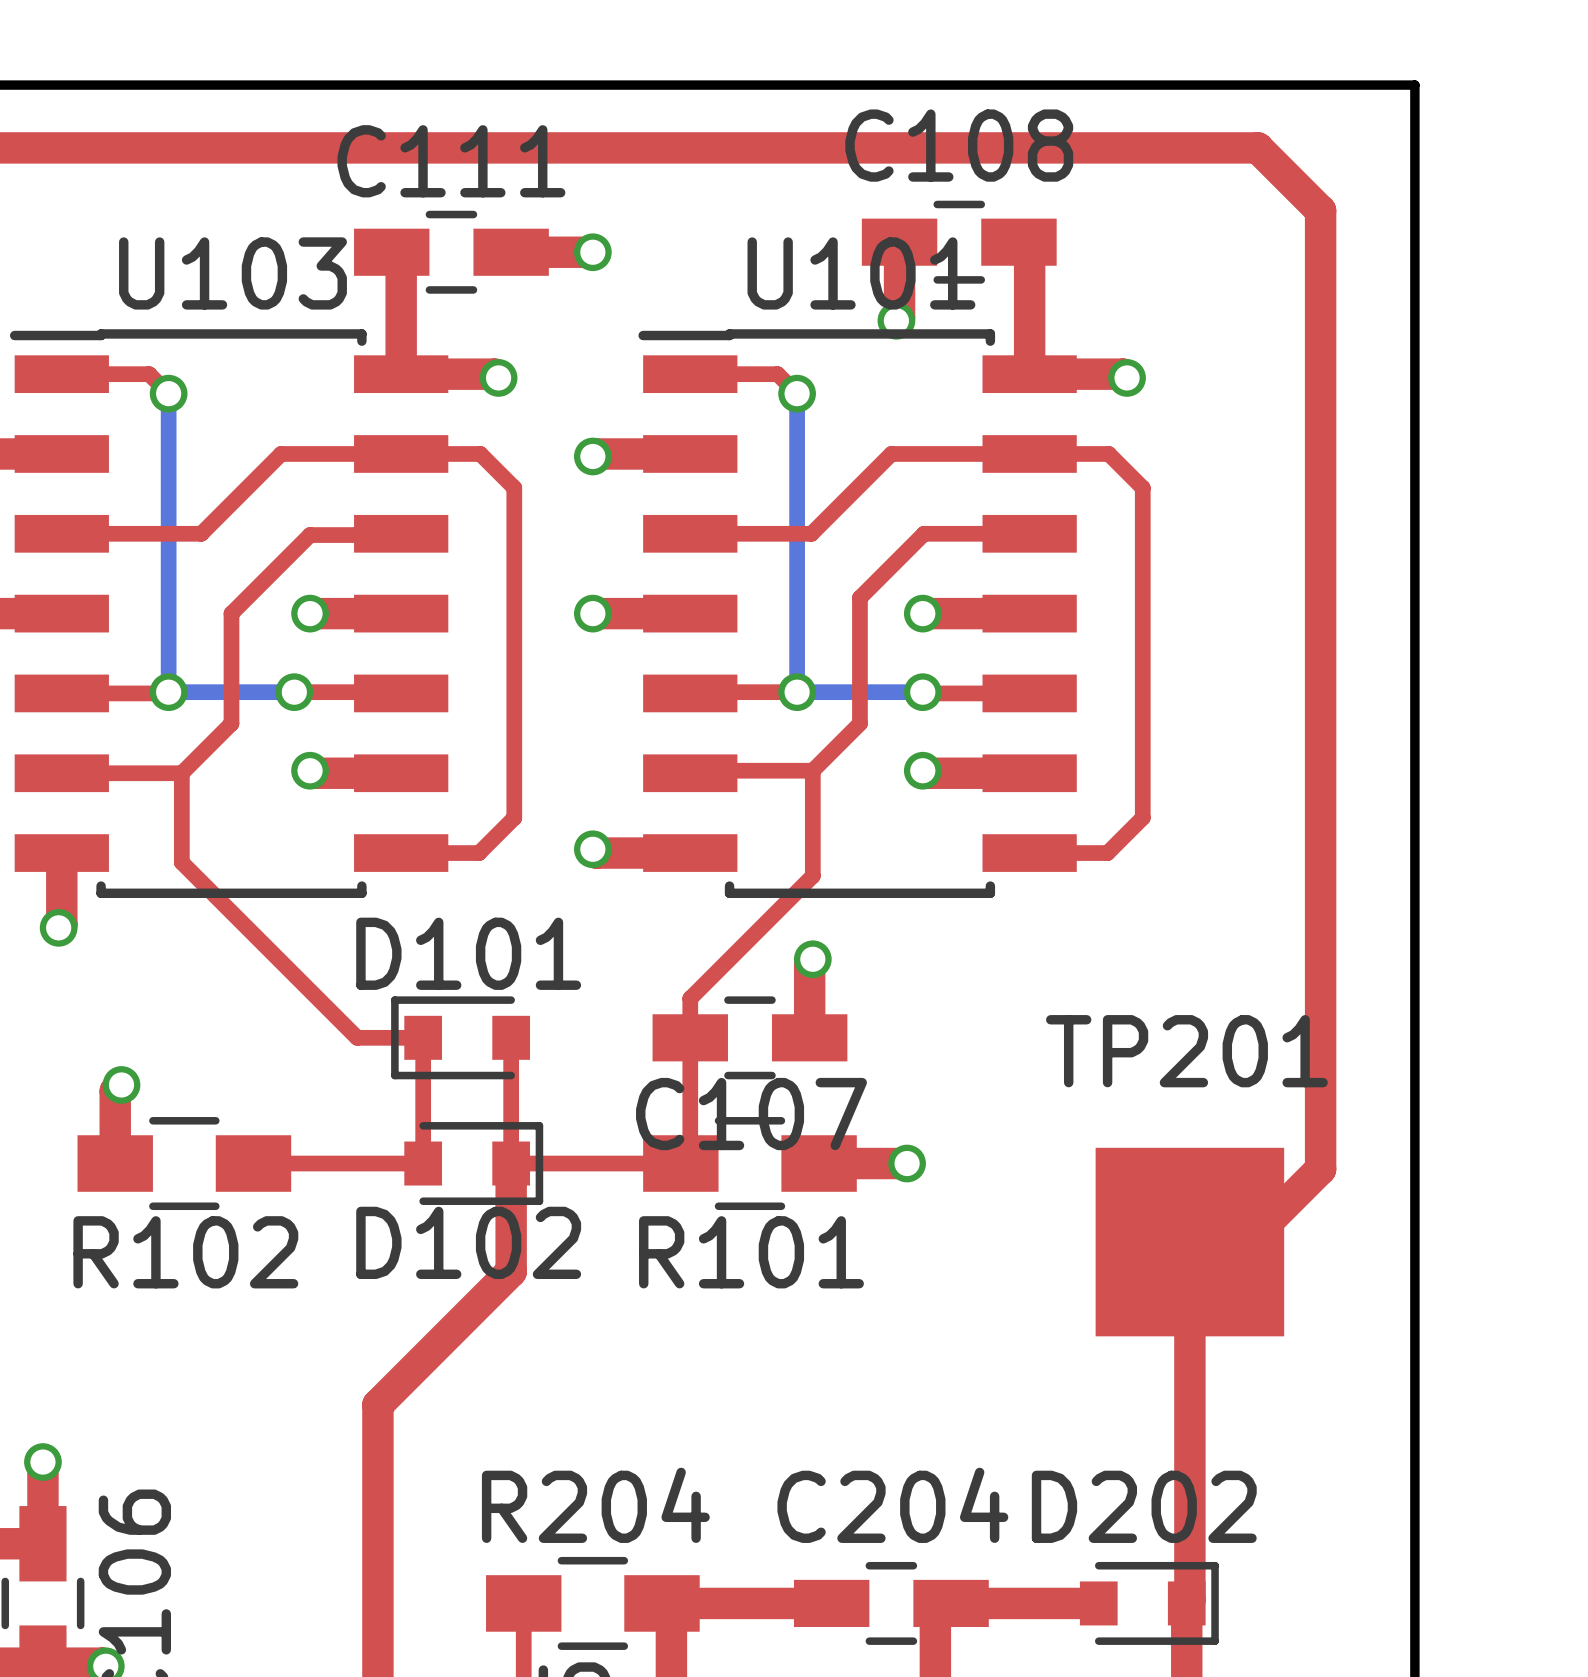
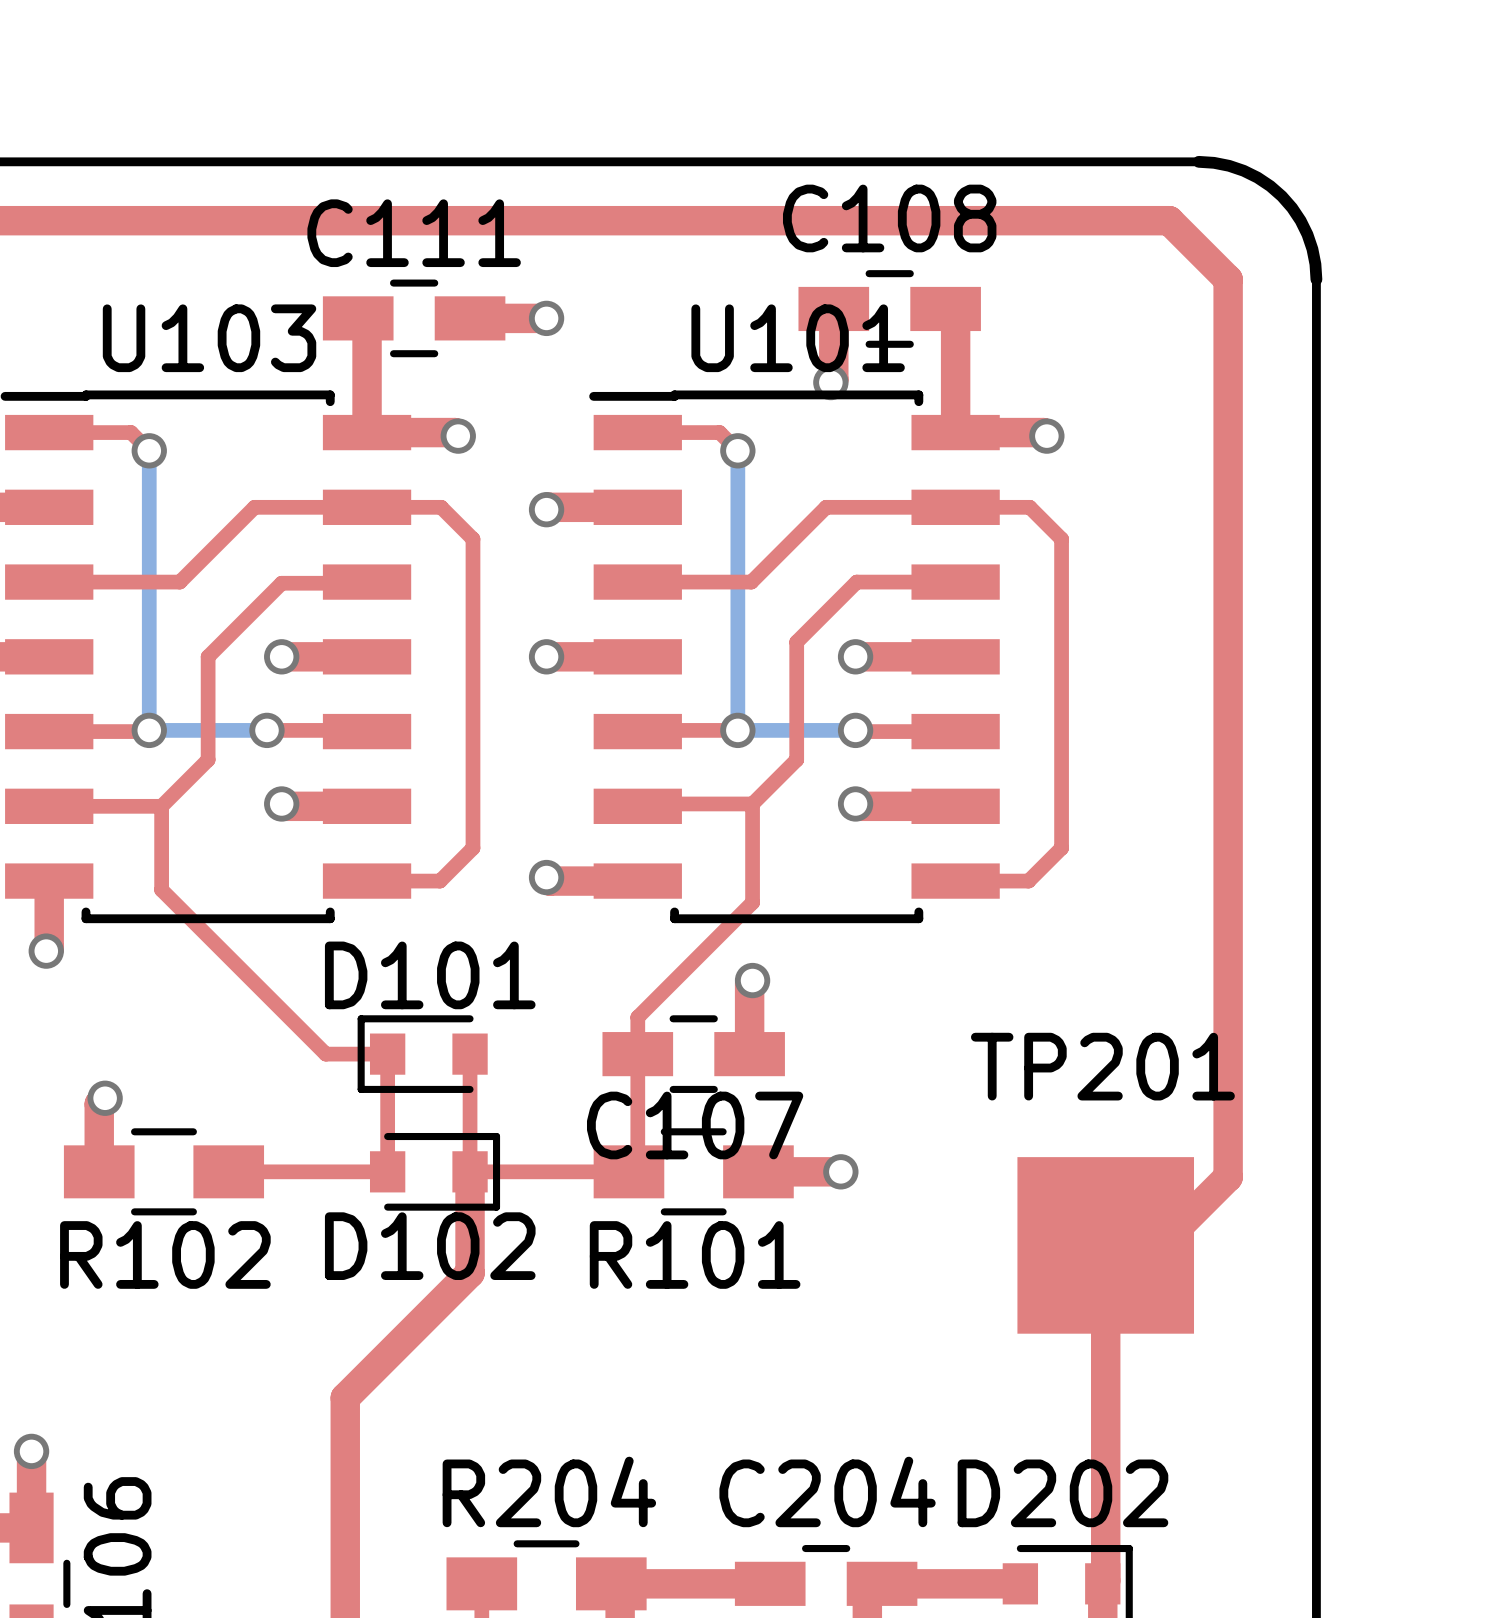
board edge: (1289, 85) (1414, 85) (1414, 210) -> (1198, 161) (1229, 165) (1243, 170) (1270, 186) (1281, 196) (1300, 220) (1307, 234) (1312, 249) (1316, 279)

